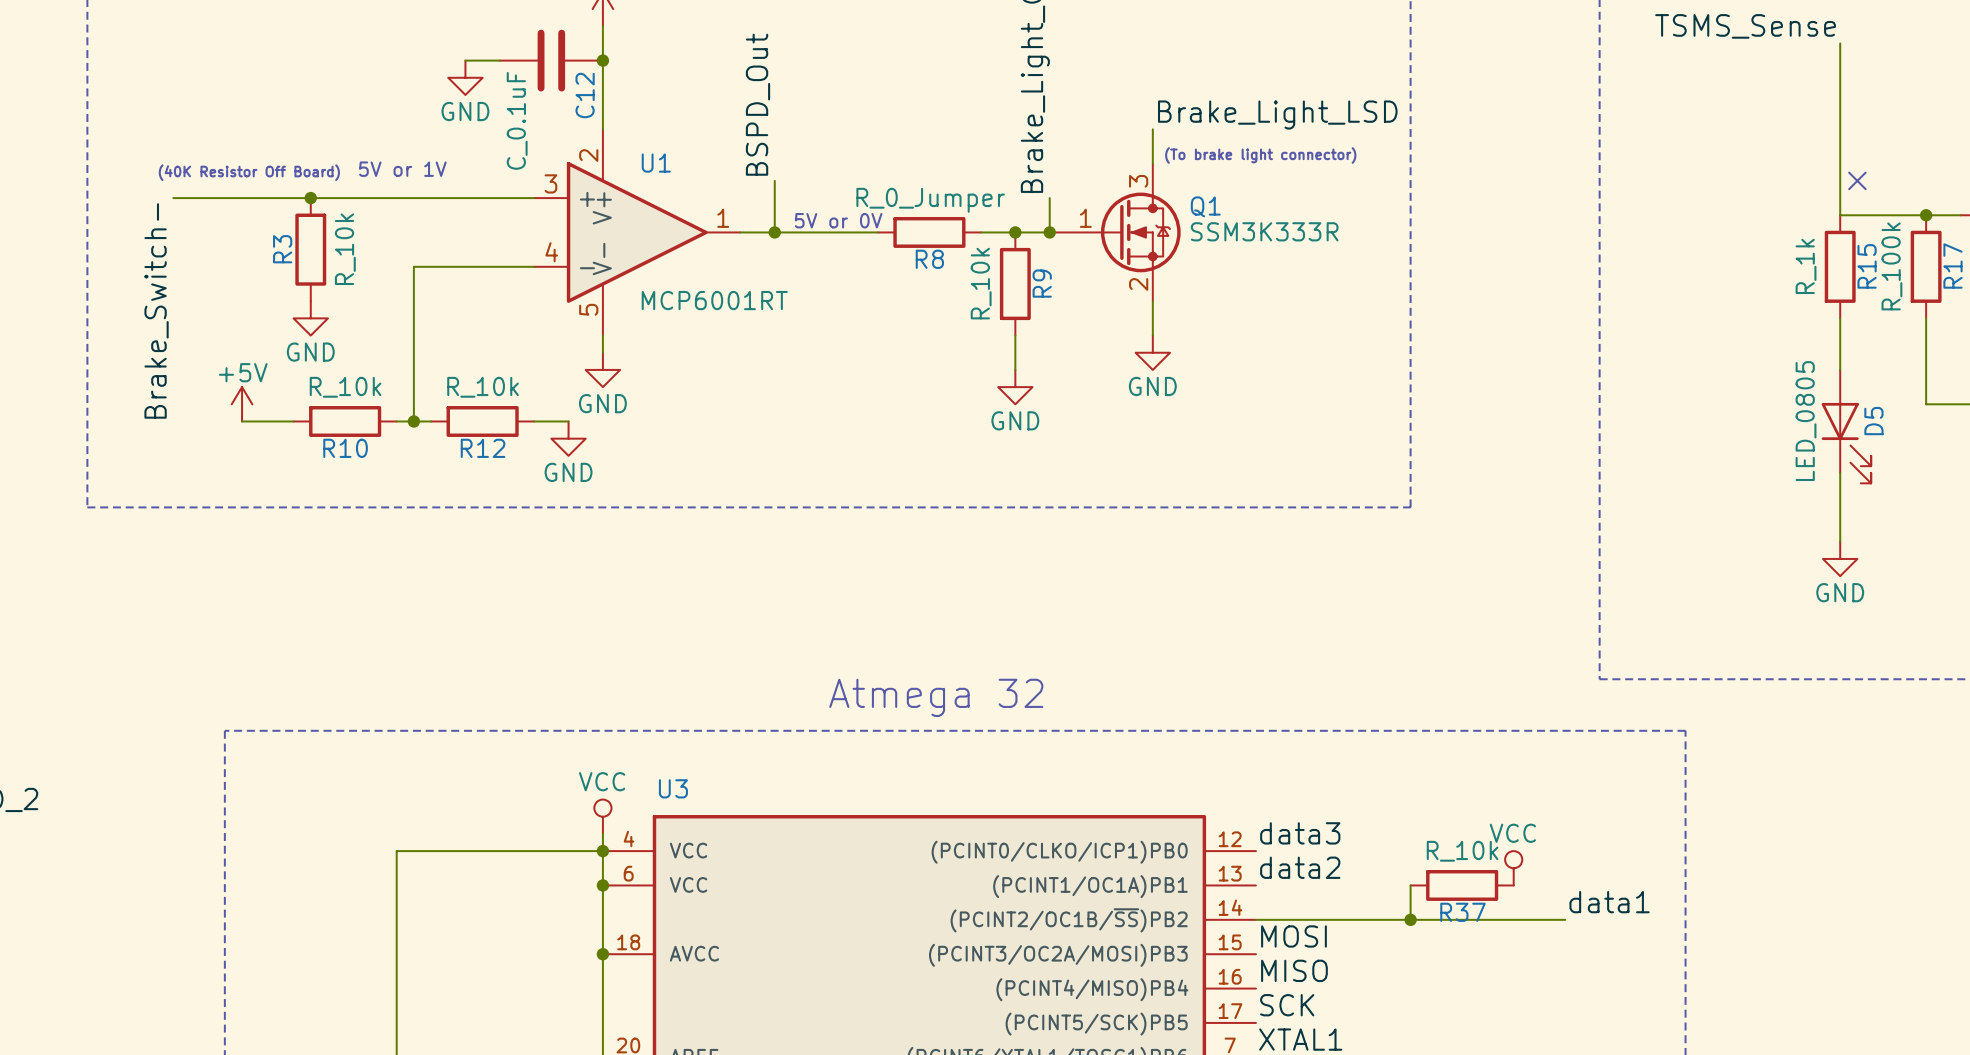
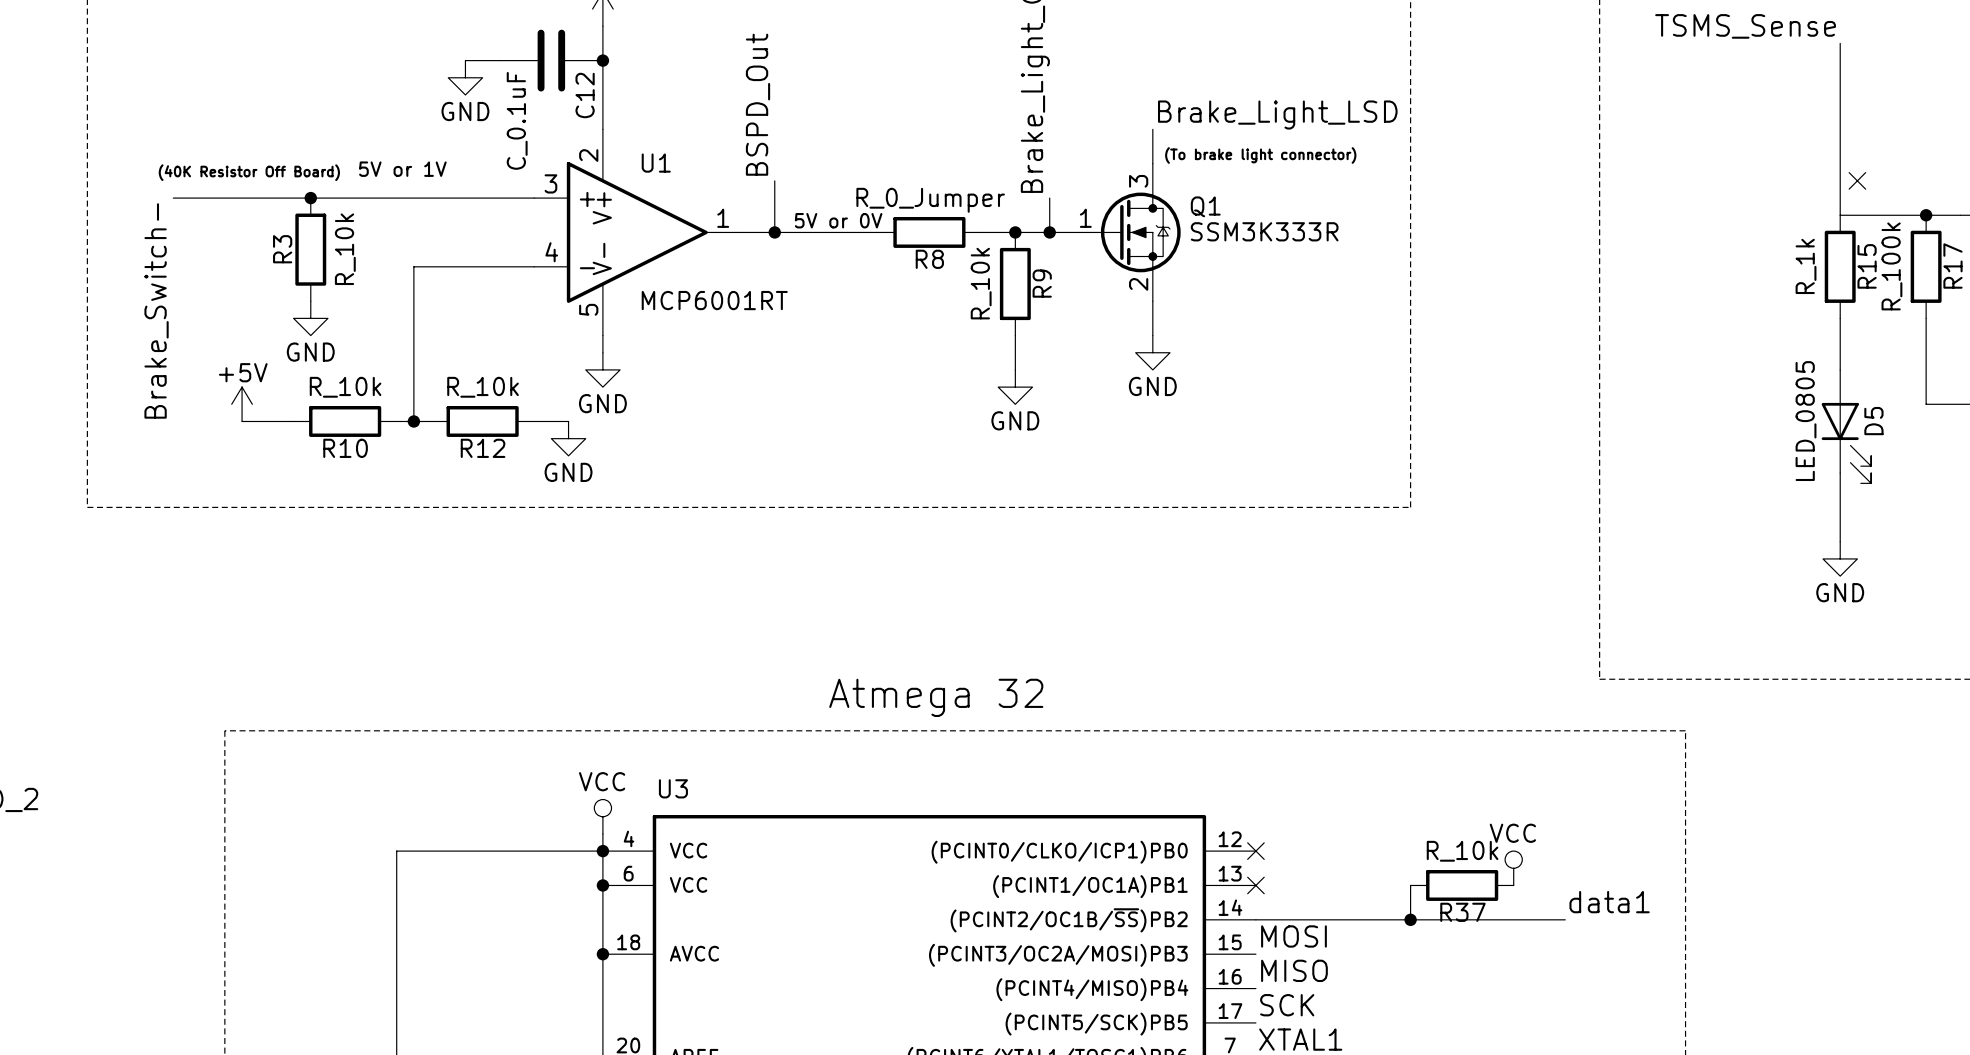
label: data3 (1300, 833) -> none
no-connect mark: none -> (1255, 851)
label: data2 (1300, 867) -> none
no-connect mark: none -> (1255, 885)

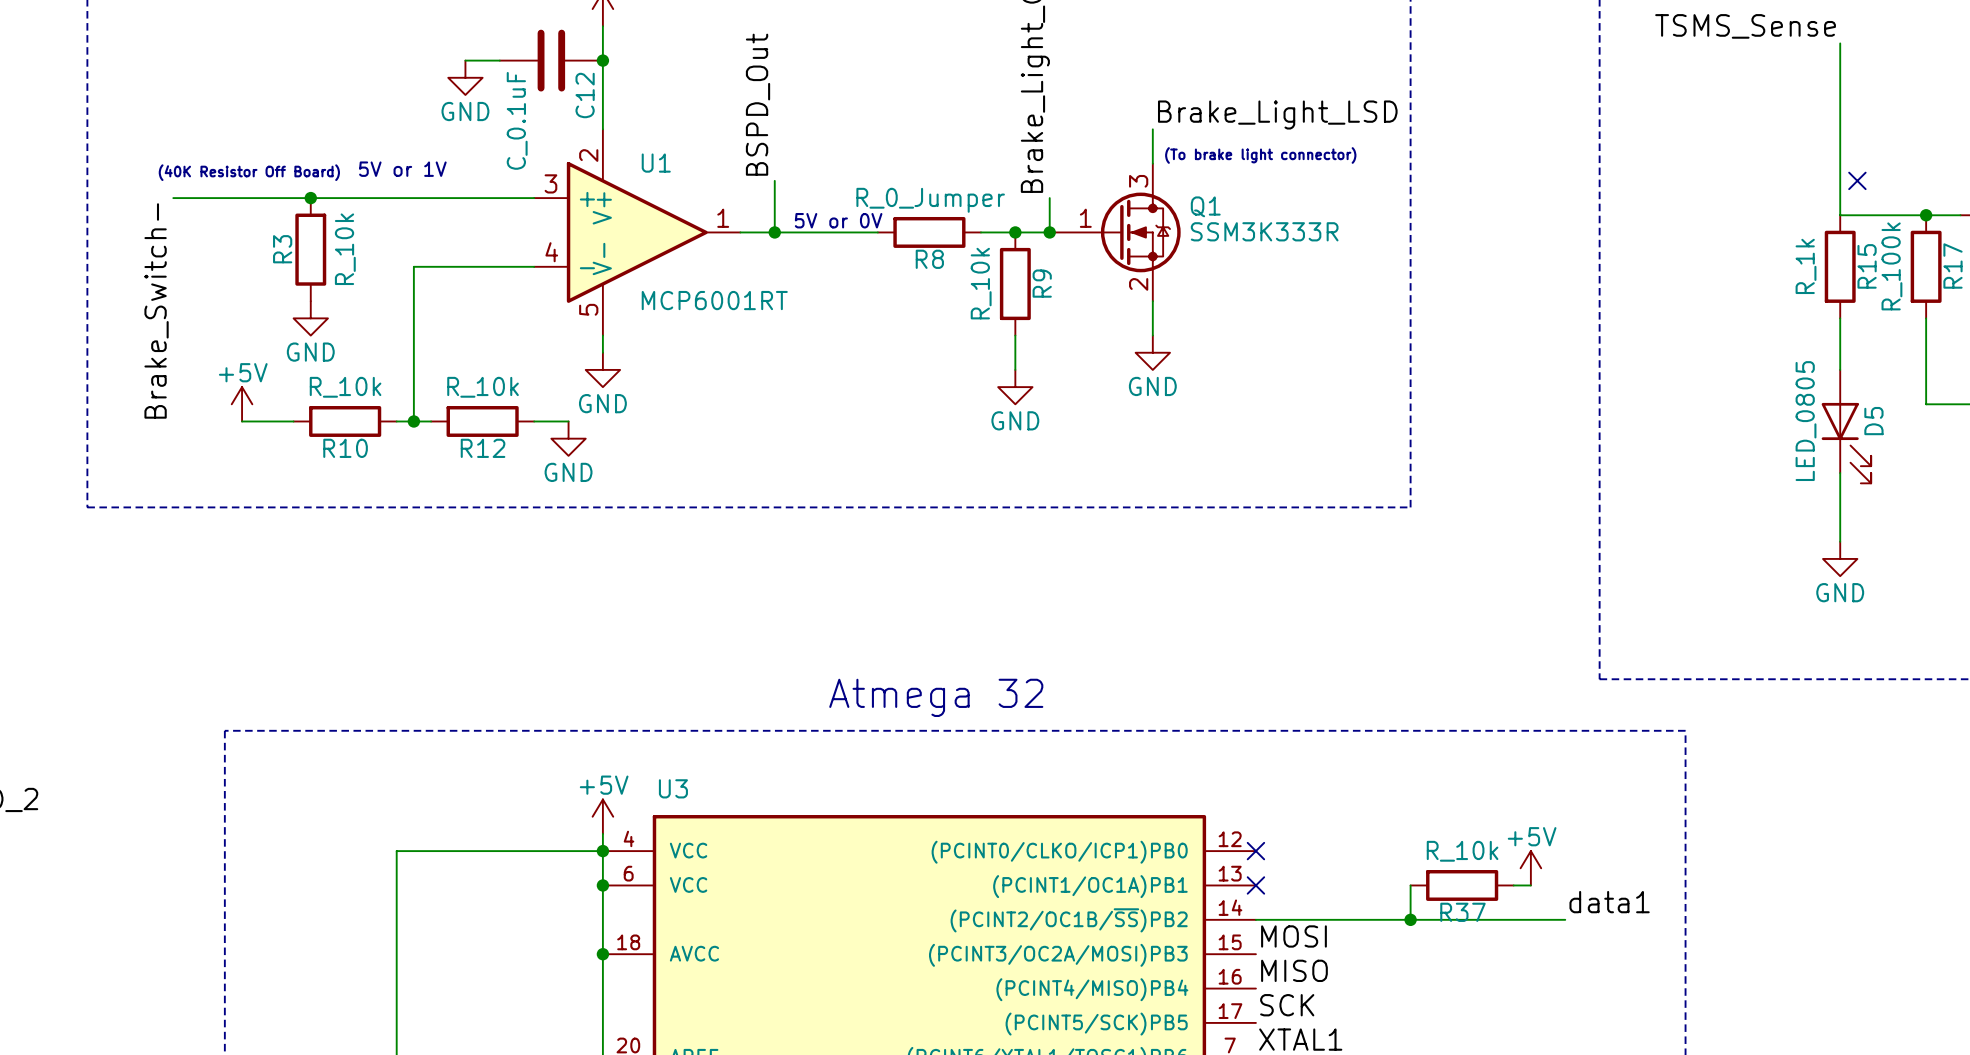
power symbol: VCC (602, 816) -> +5V (602, 816)
power symbol: VCC (1513, 868) -> none
power symbol: none -> +5V (1530, 868)
wire: none -> (1513, 885) (1530, 885)

